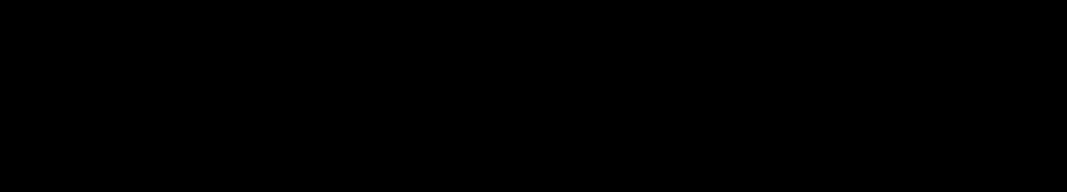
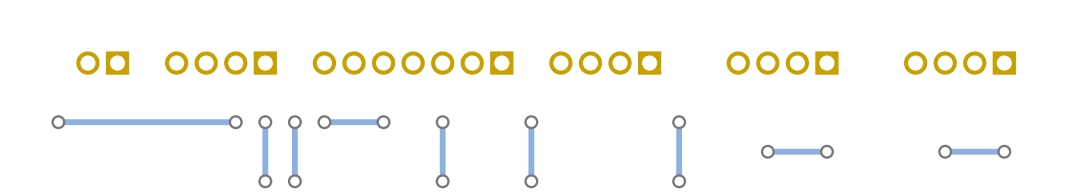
part: none -> (102, 63)
part: none -> (220, 63)
part: none -> (413, 63)
part: none -> (605, 63)
part: none -> (782, 63)
part: none -> (959, 63)
via: none -> (58, 122)
track: none -> (235, 122) (58, 122)
via: none -> (235, 122)
track: none -> (265, 122) (265, 181)
via: none -> (265, 122)
track: none -> (294, 122) (294, 181)
via: none -> (294, 122)
via: none -> (324, 122)
track: none -> (383, 122) (324, 122)
via: none -> (383, 122)
track: none -> (442, 122) (442, 181)
via: none -> (442, 122)
track: none -> (531, 122) (531, 181)
via: none -> (531, 122)
track: none -> (679, 122) (679, 181)
via: none -> (679, 122)
via: none -> (767, 151)
track: none -> (826, 151) (767, 151)
via: none -> (826, 151)
via: none -> (945, 151)
track: none -> (1004, 151) (945, 151)
via: none -> (1004, 151)
via: none -> (265, 181)
via: none -> (294, 181)
via: none -> (442, 181)
via: none -> (531, 181)
via: none -> (679, 181)

